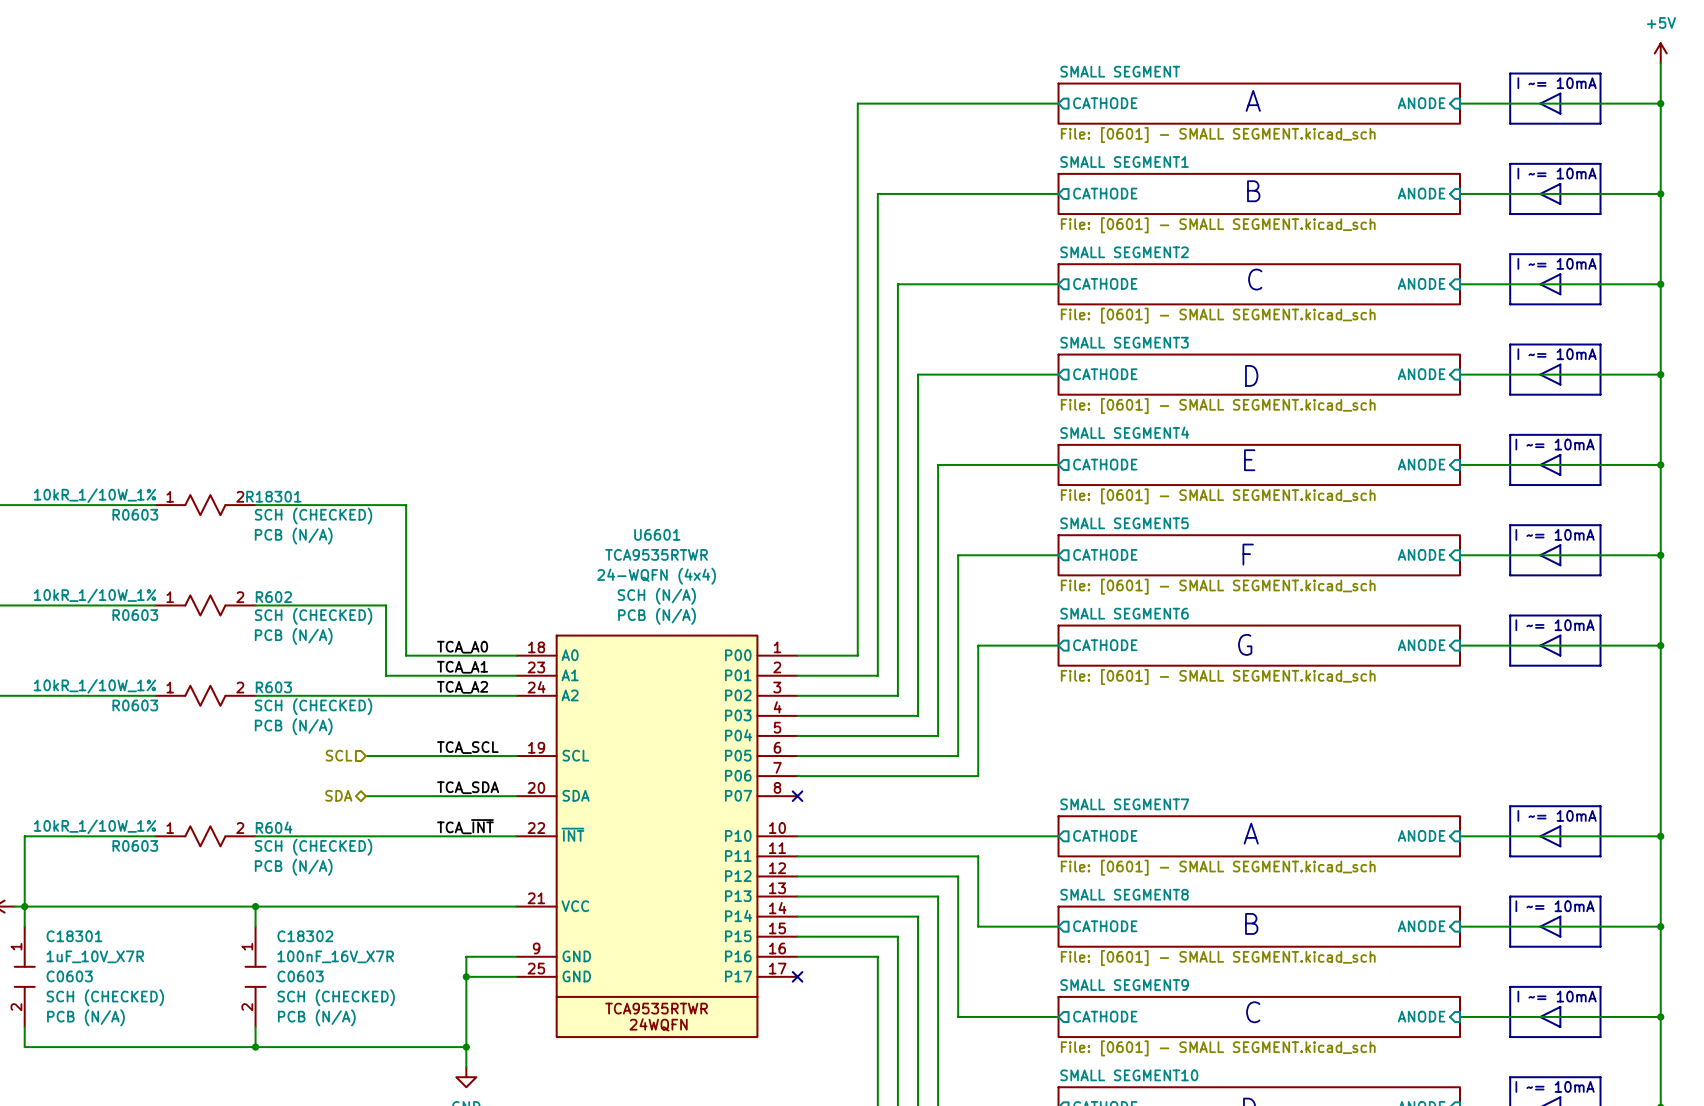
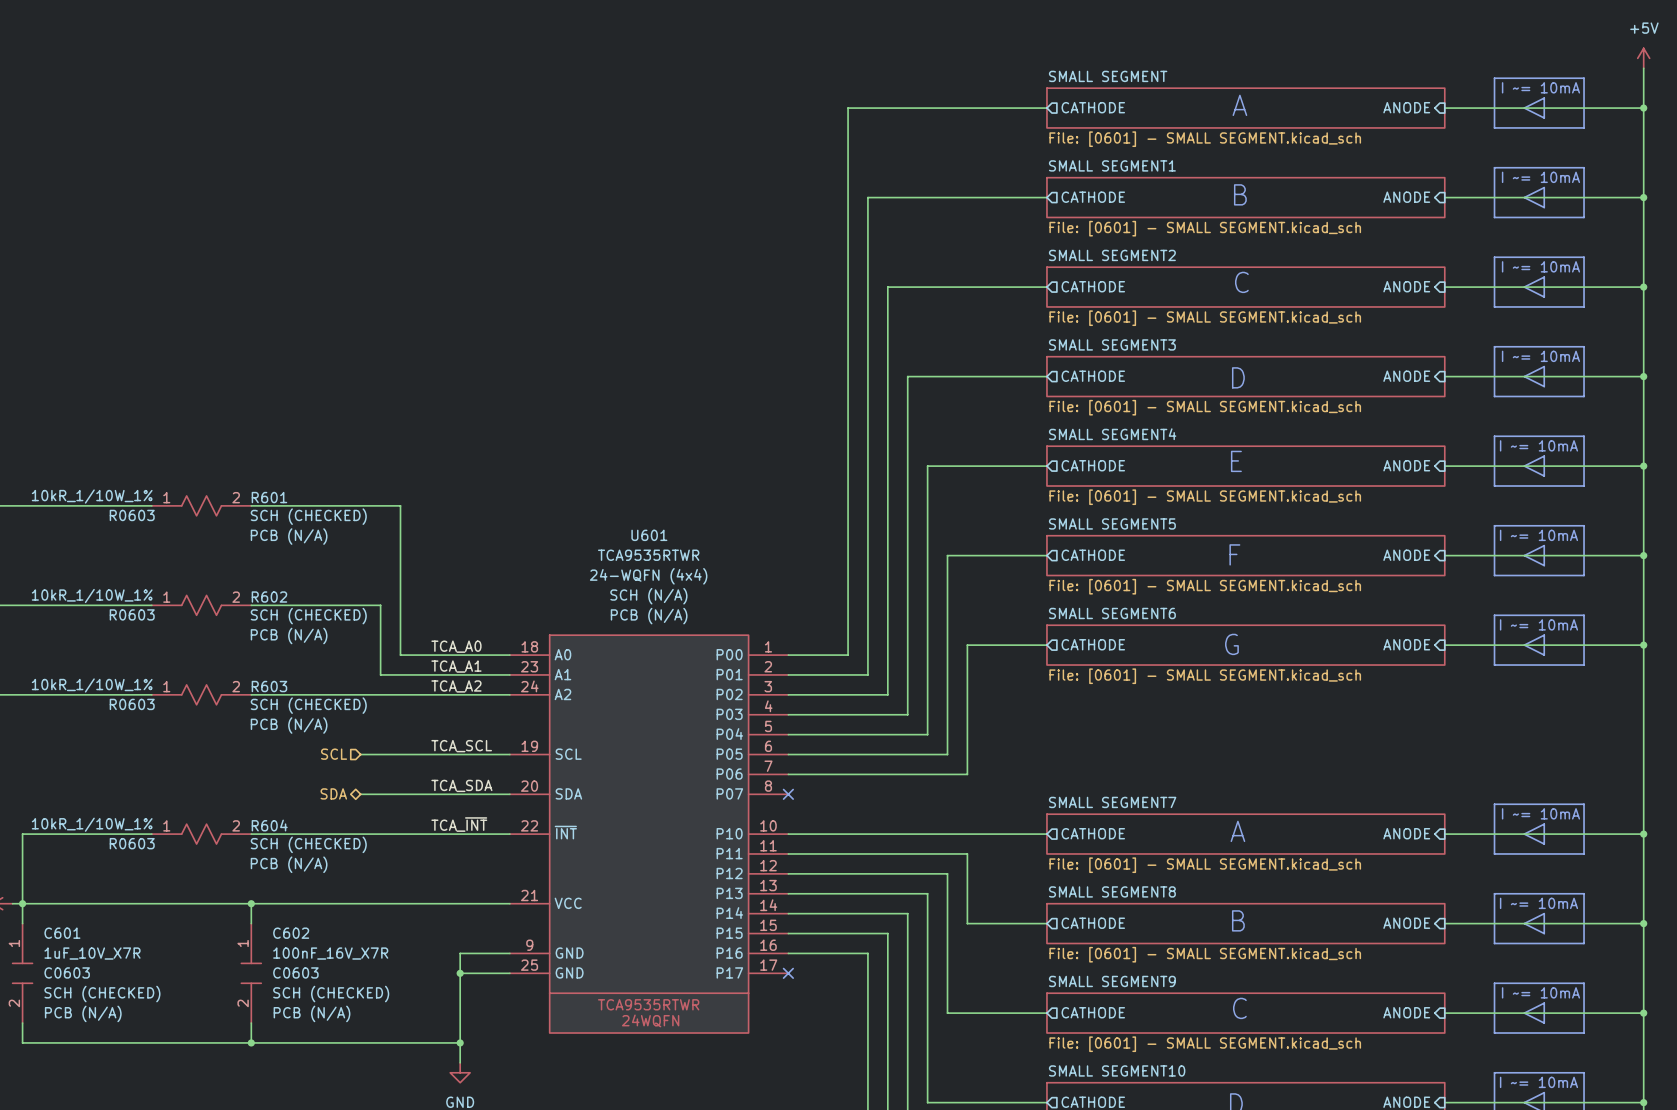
R18301 name: R18301 (273, 496) -> R601 (269, 497)
U6601 name: U6601 (657, 534) -> U601 (649, 535)
C18301 name: C18301 (74, 936) -> C601 (62, 933)
C18302 name: C18302 (305, 936) -> C602 (291, 933)

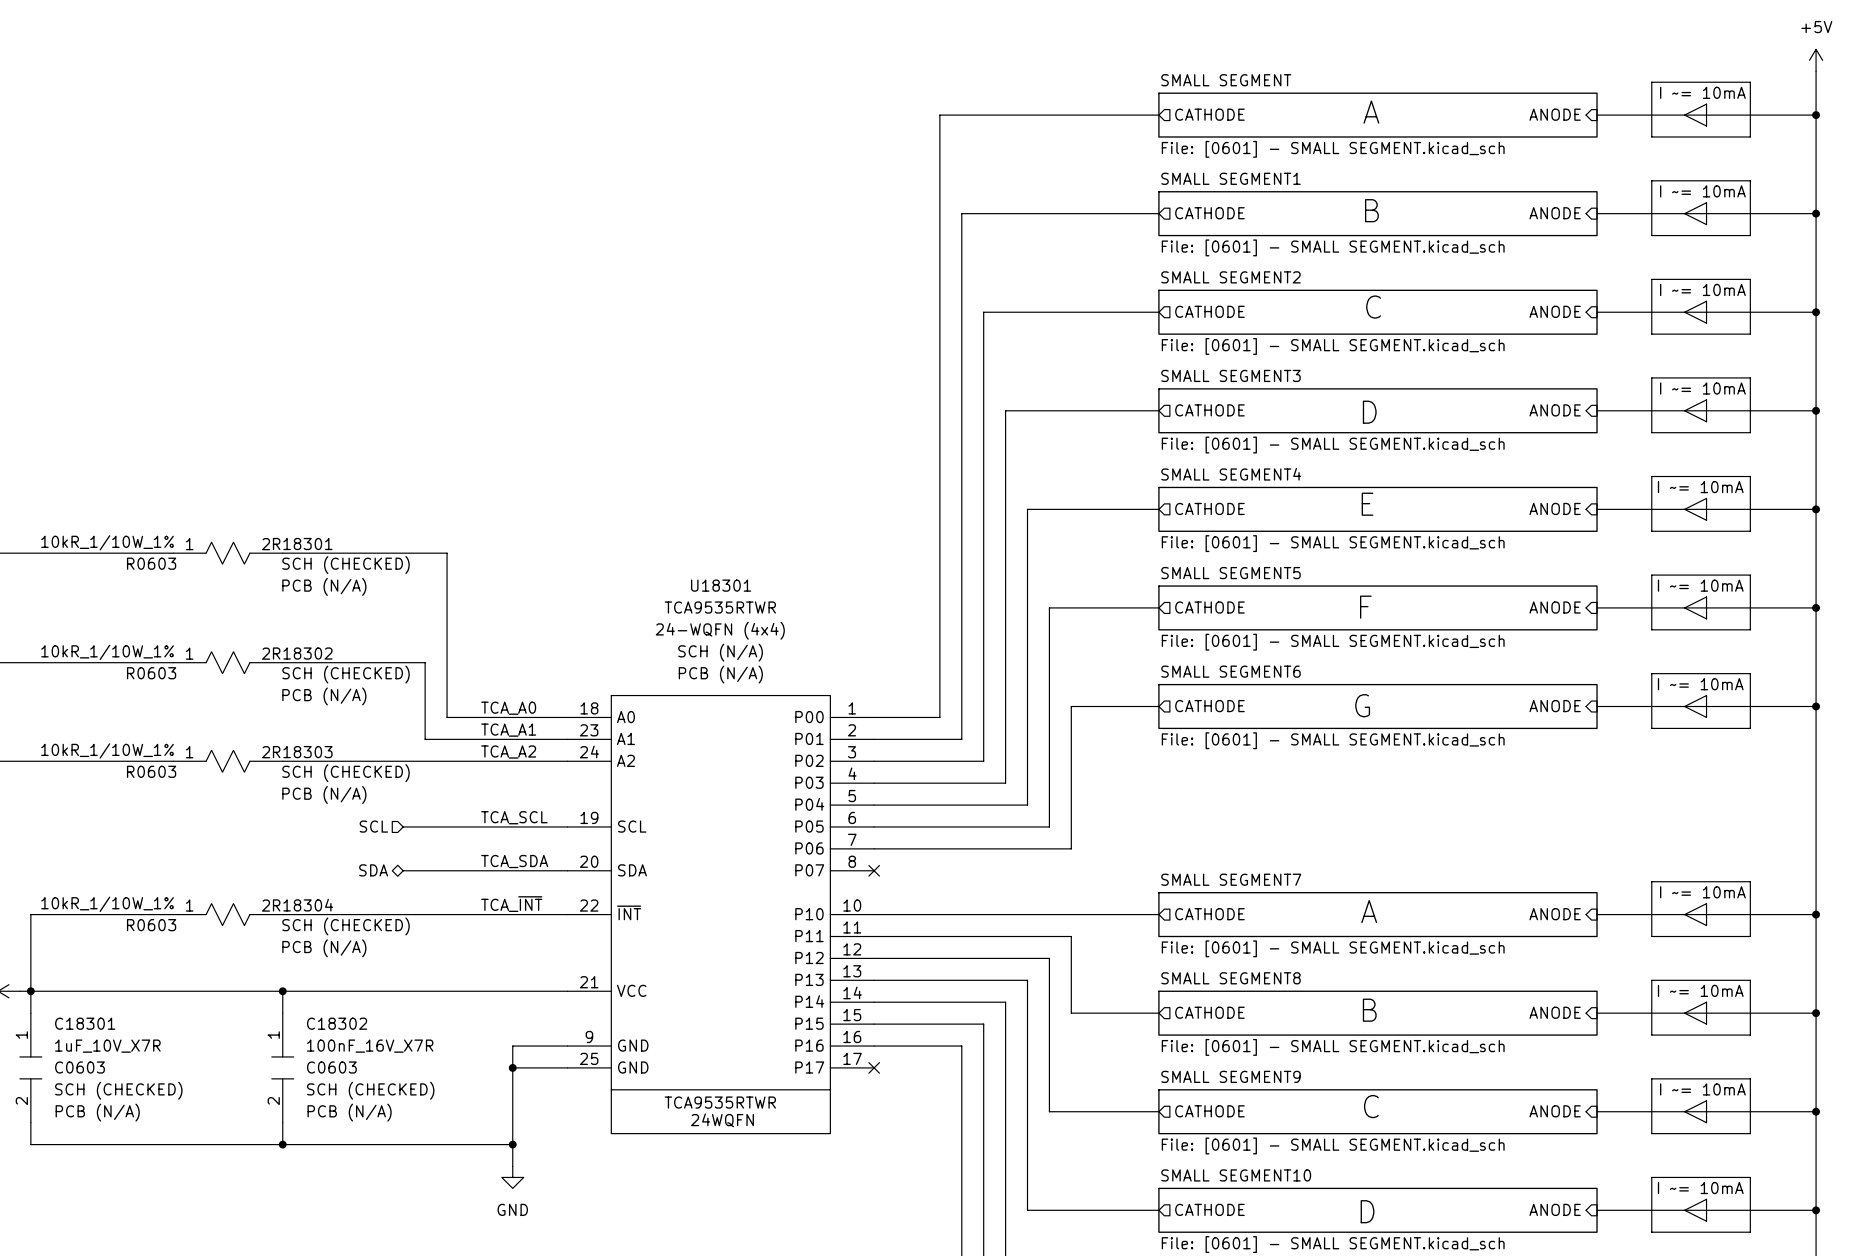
R601 name: R601 (269, 497) -> R18301 (302, 544)
U601 name: U601 (649, 535) -> U18301 (721, 585)
R602 name: R602 (269, 597) -> R18302 (302, 653)
R603 name: R603 (269, 686) -> R18303 (302, 752)
R604 name: R604 (269, 825) -> R18304 (302, 905)
C601 name: C601 (62, 933) -> C18301 (85, 1023)
C602 name: C602 (291, 933) -> C18302 (337, 1023)

